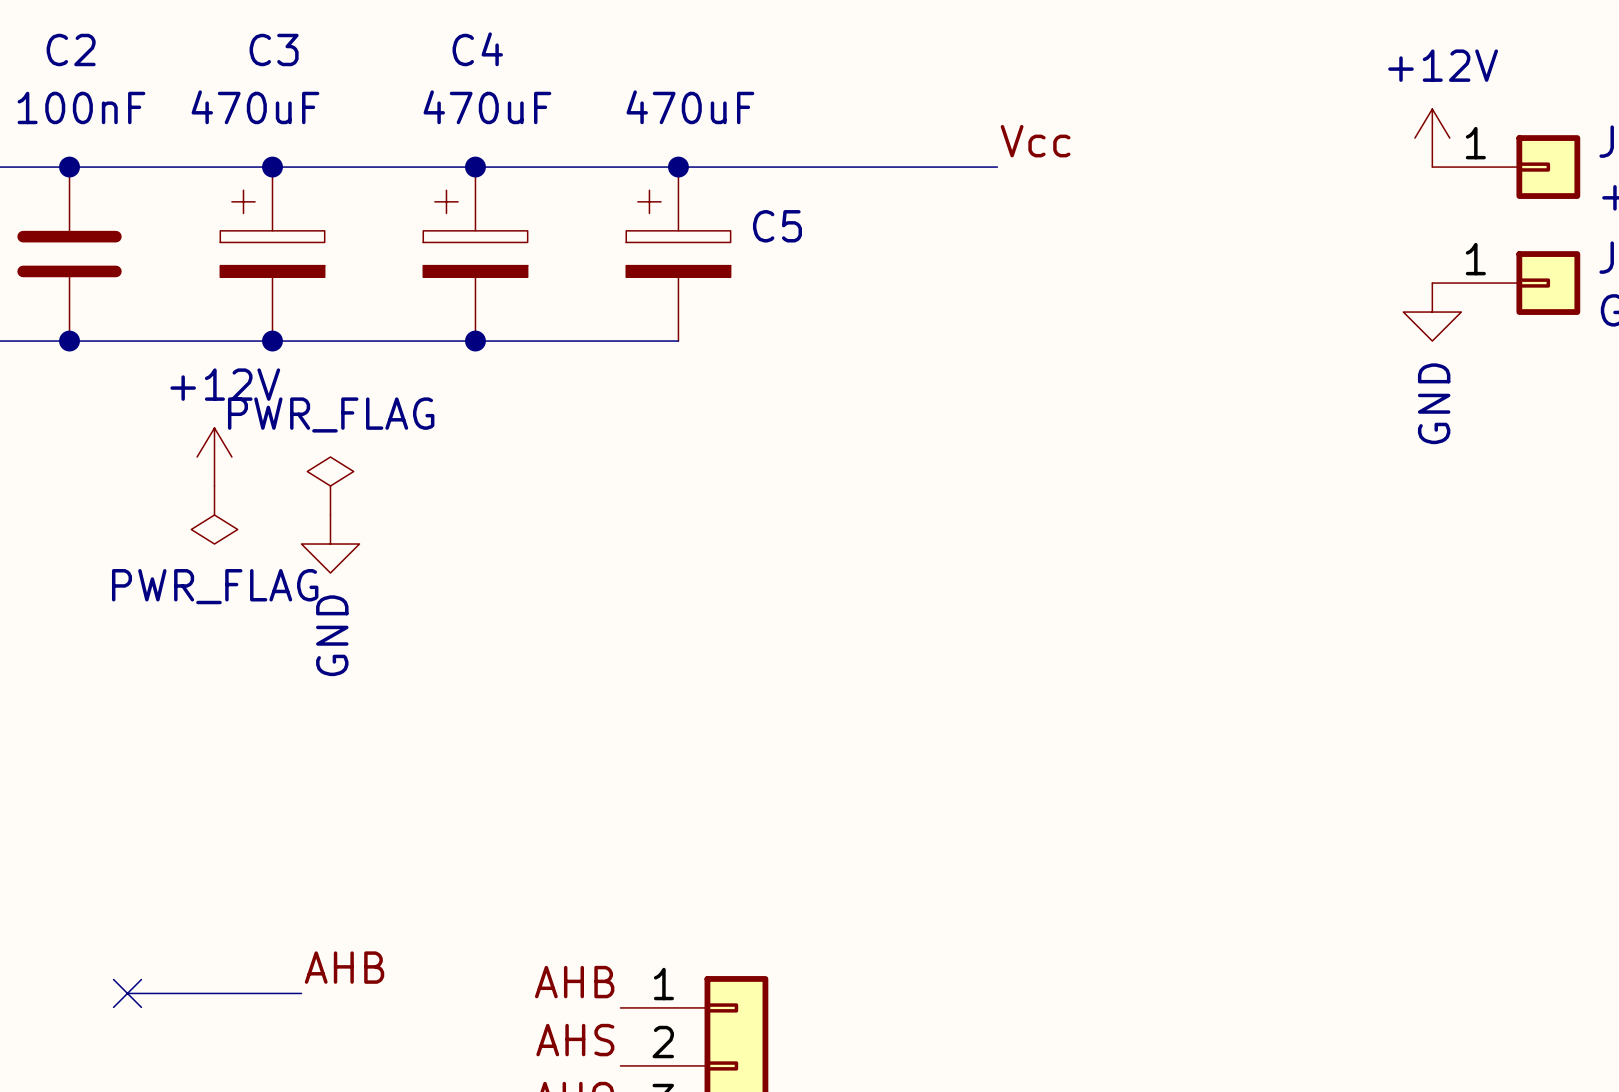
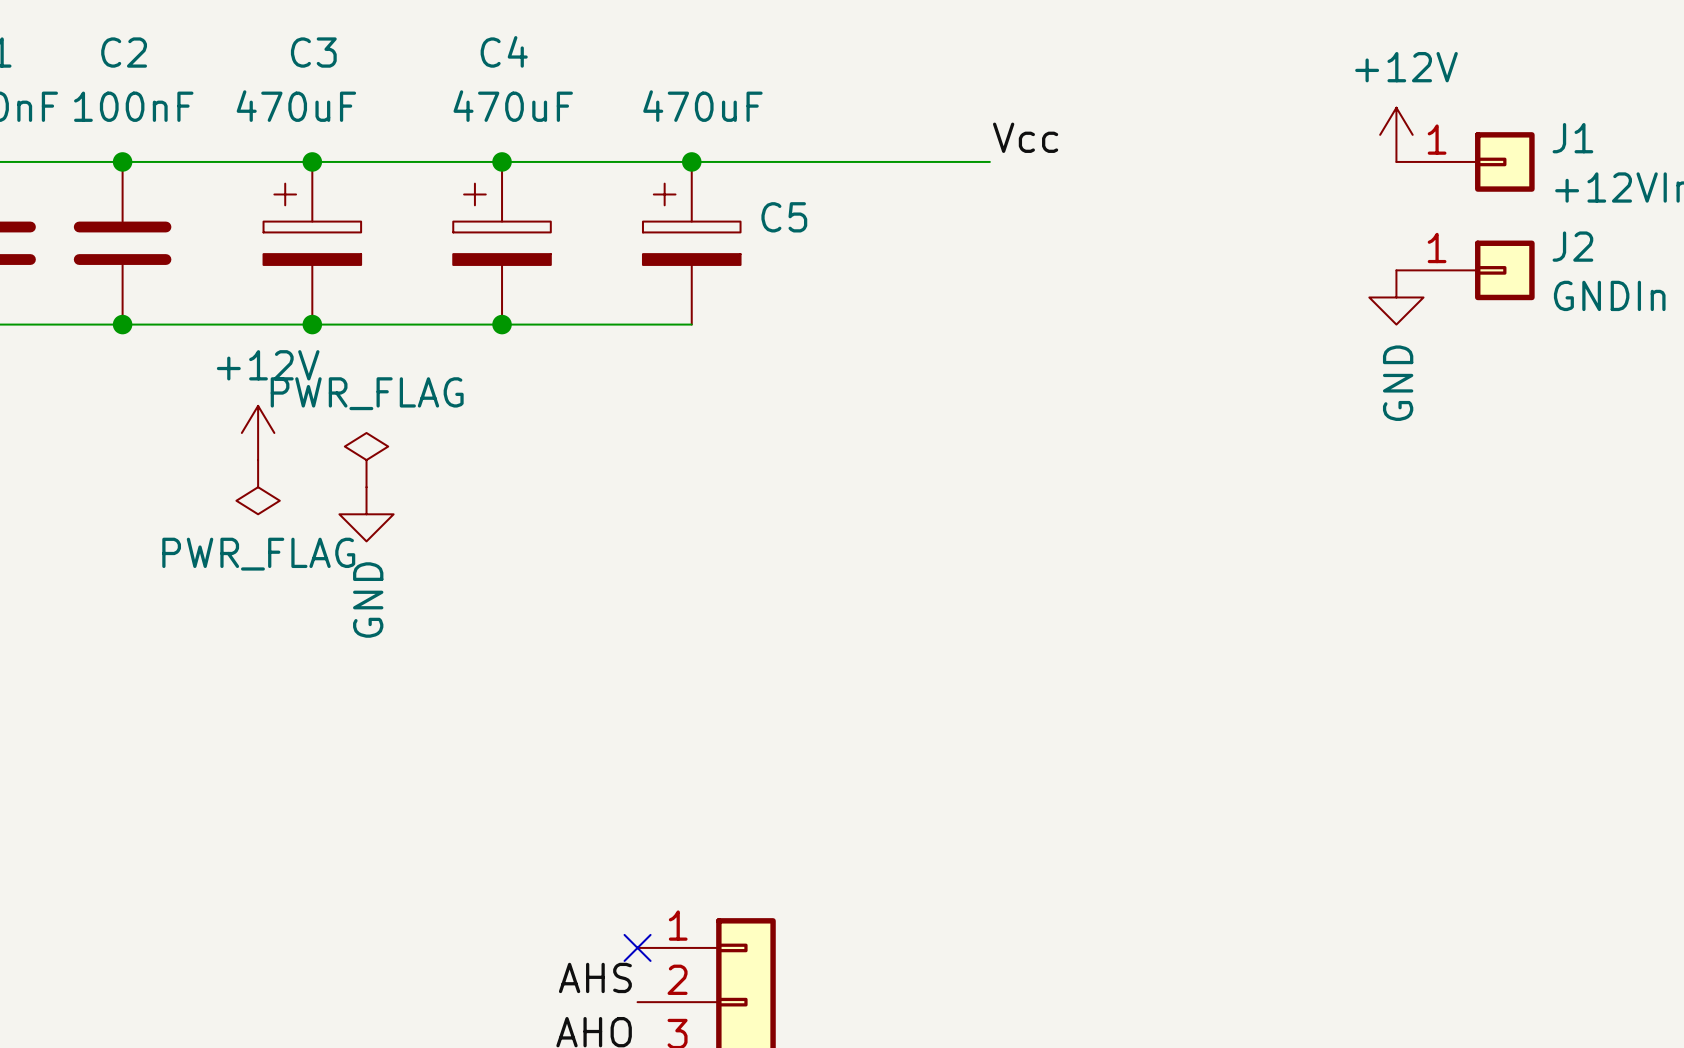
label: AHB (344, 967) -> none
label: AHB (574, 982) -> none
wire: (127, 993) (301, 993) -> none
no-connect mark: (127, 993) -> none
no-connect mark: none -> (637, 947)

